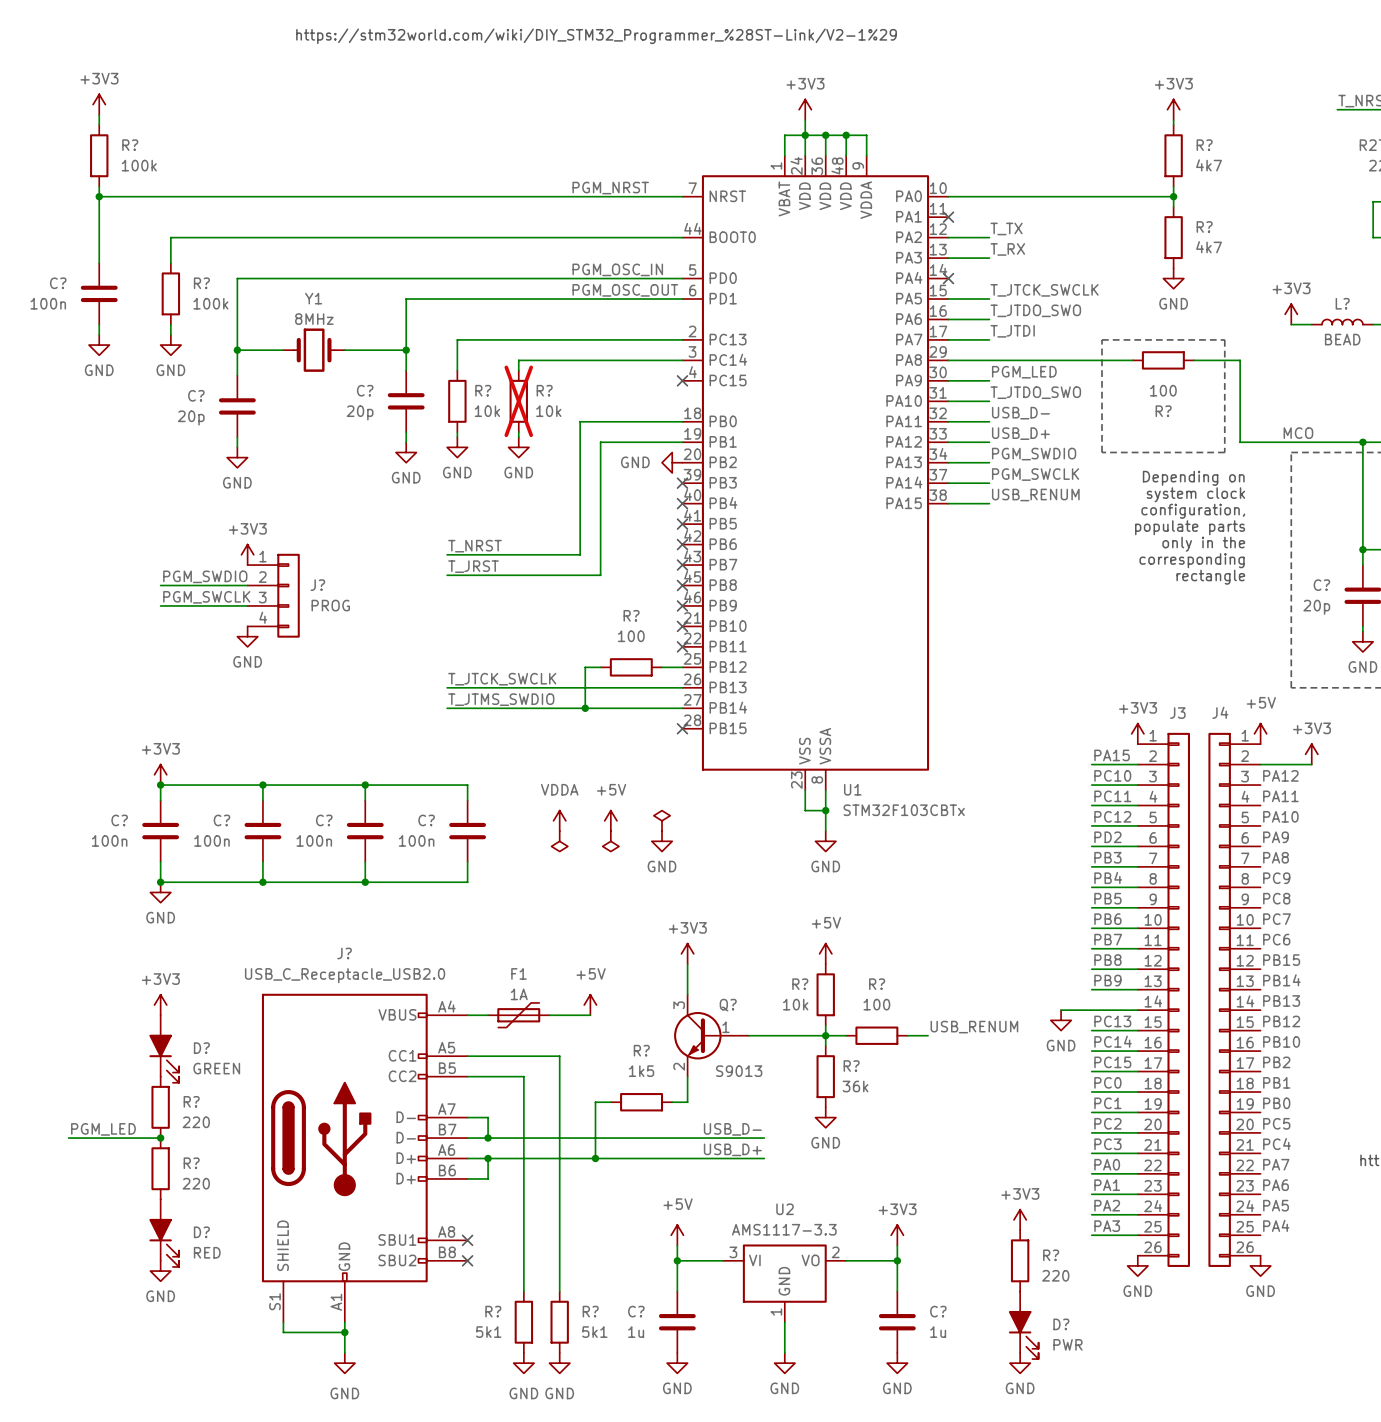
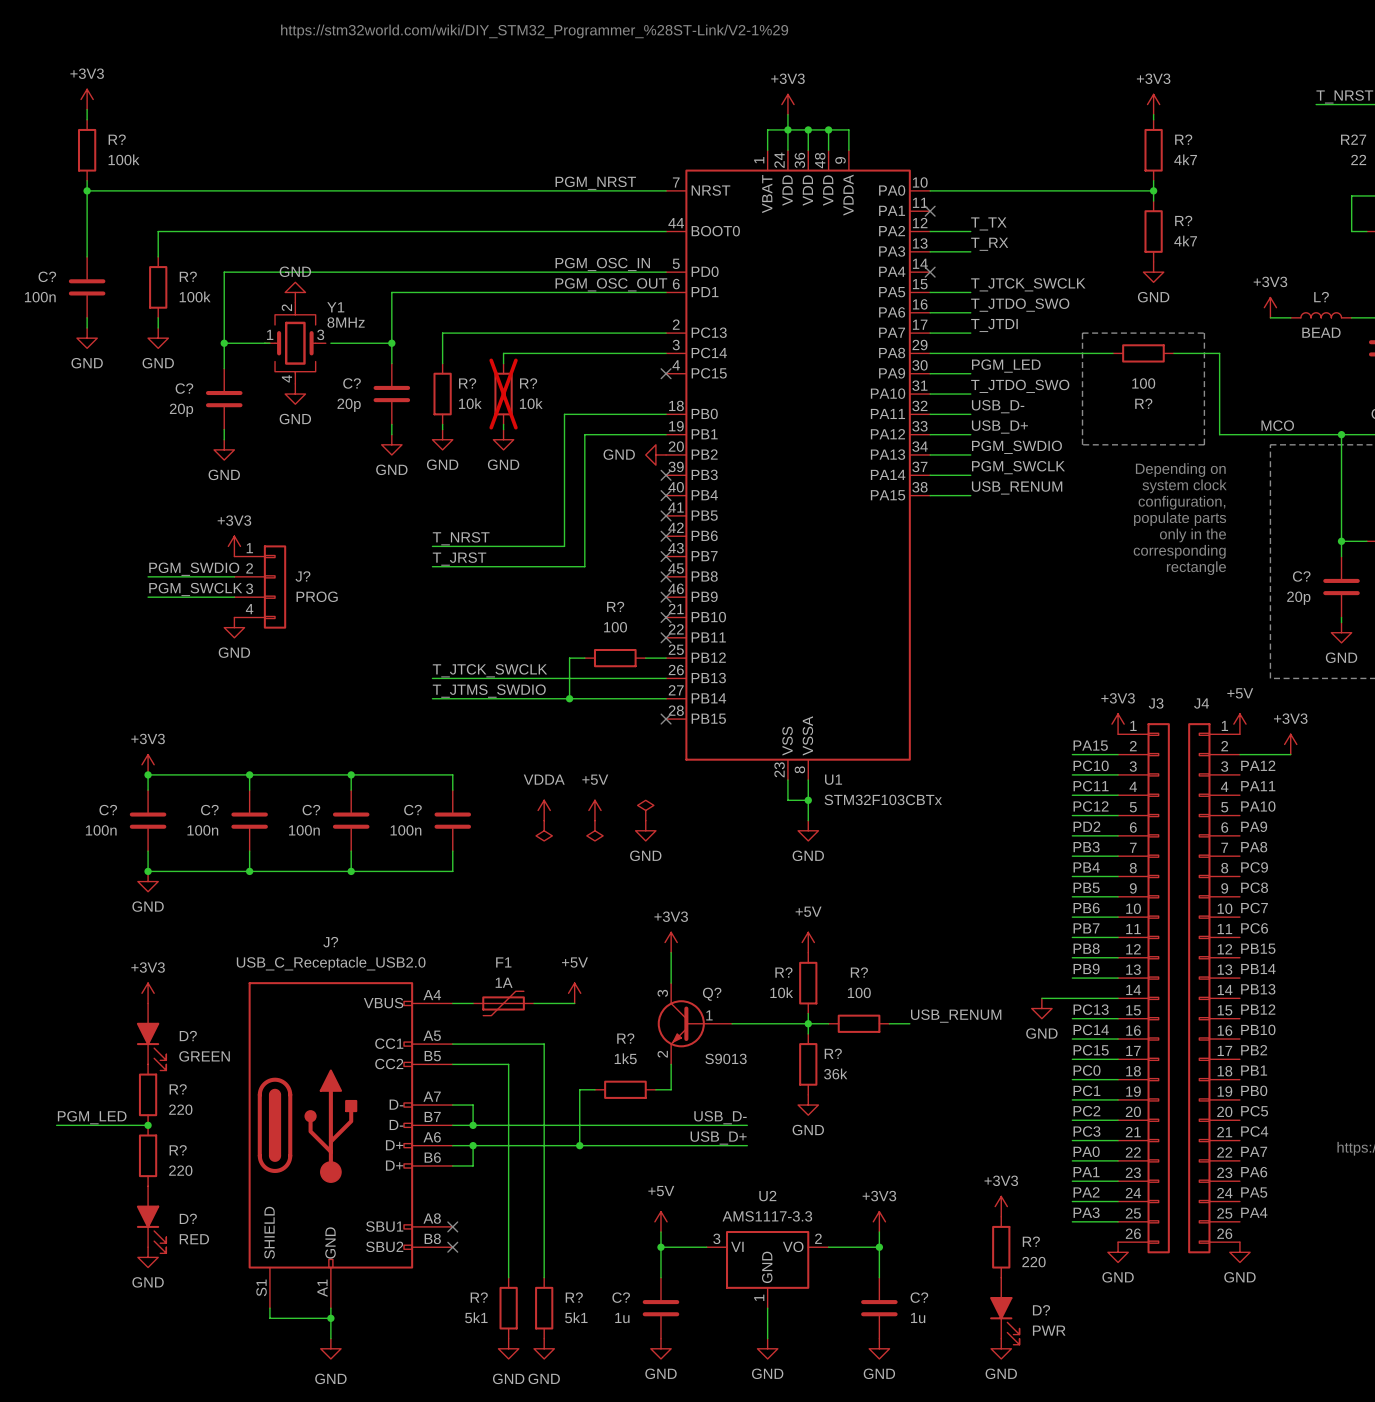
Y1 name position: Y1 (313, 298) -> Y1 (335, 307)
power symbol: none -> GND (295, 292)
Y1 value position: 8MHz (314, 319) -> 8MHz (346, 322)
Y1 symbol: [283, 328, 345, 372] -> [264, 302, 326, 384]
power symbol: none -> GND (295, 394)

